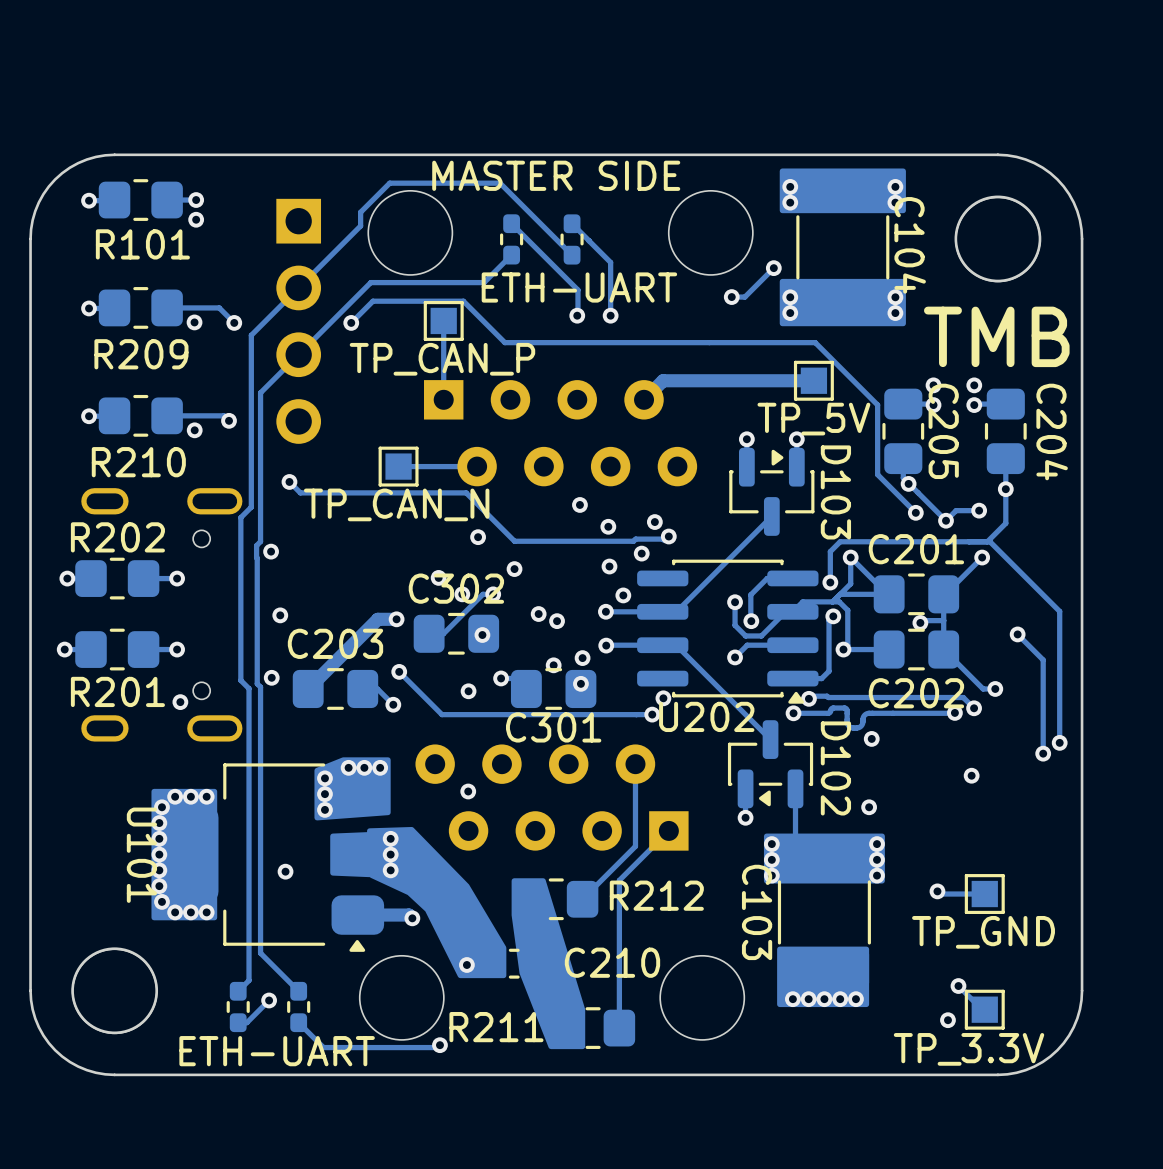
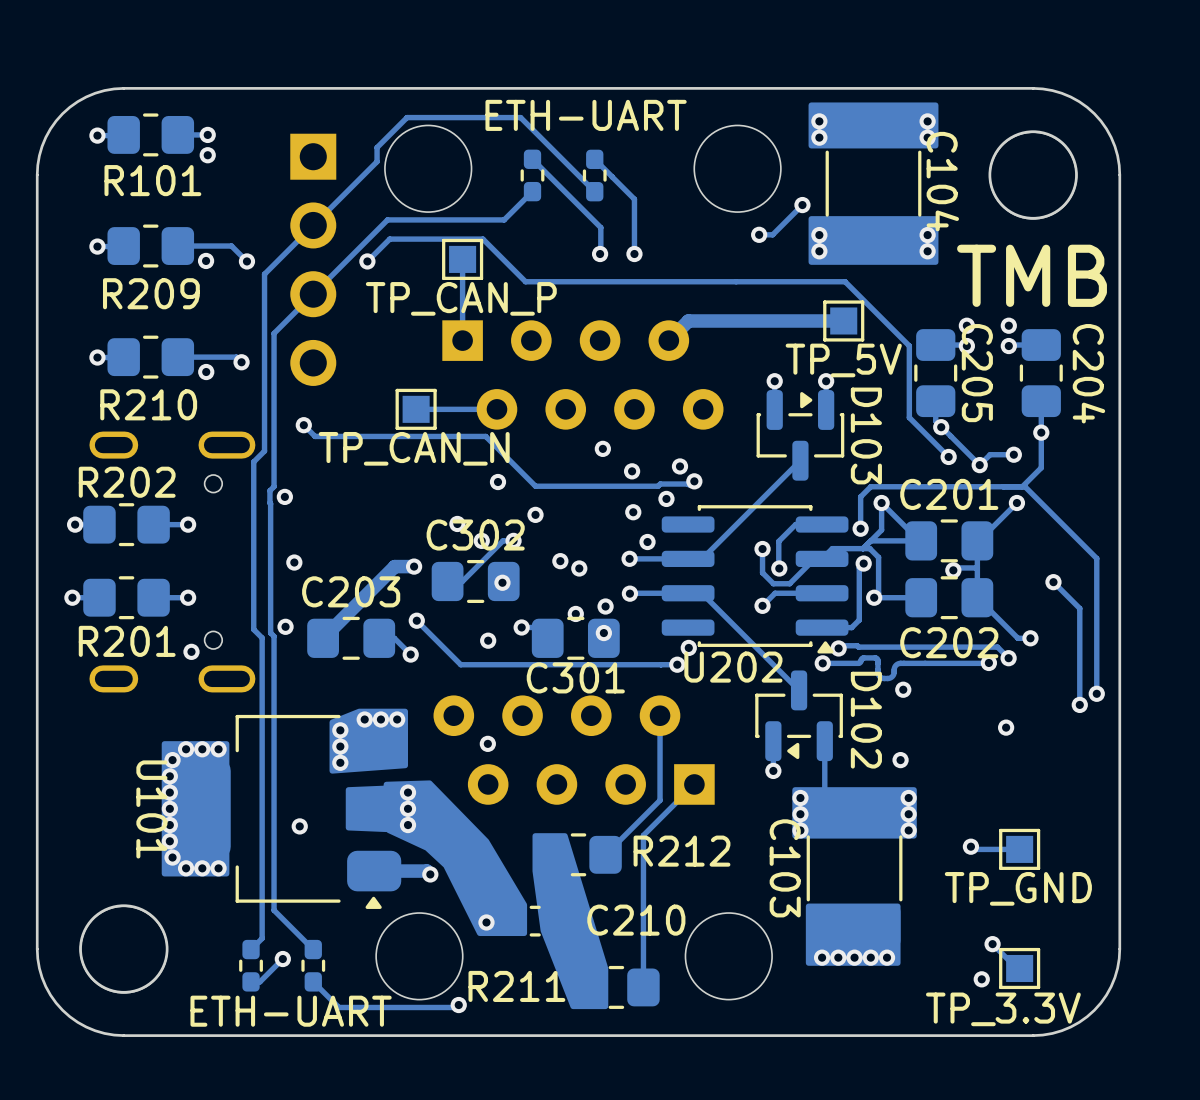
text: MASTER SIDE (556, 175) -> none
text position: ETH-UART (579, 287) -> ETH-UART (586, 115)

